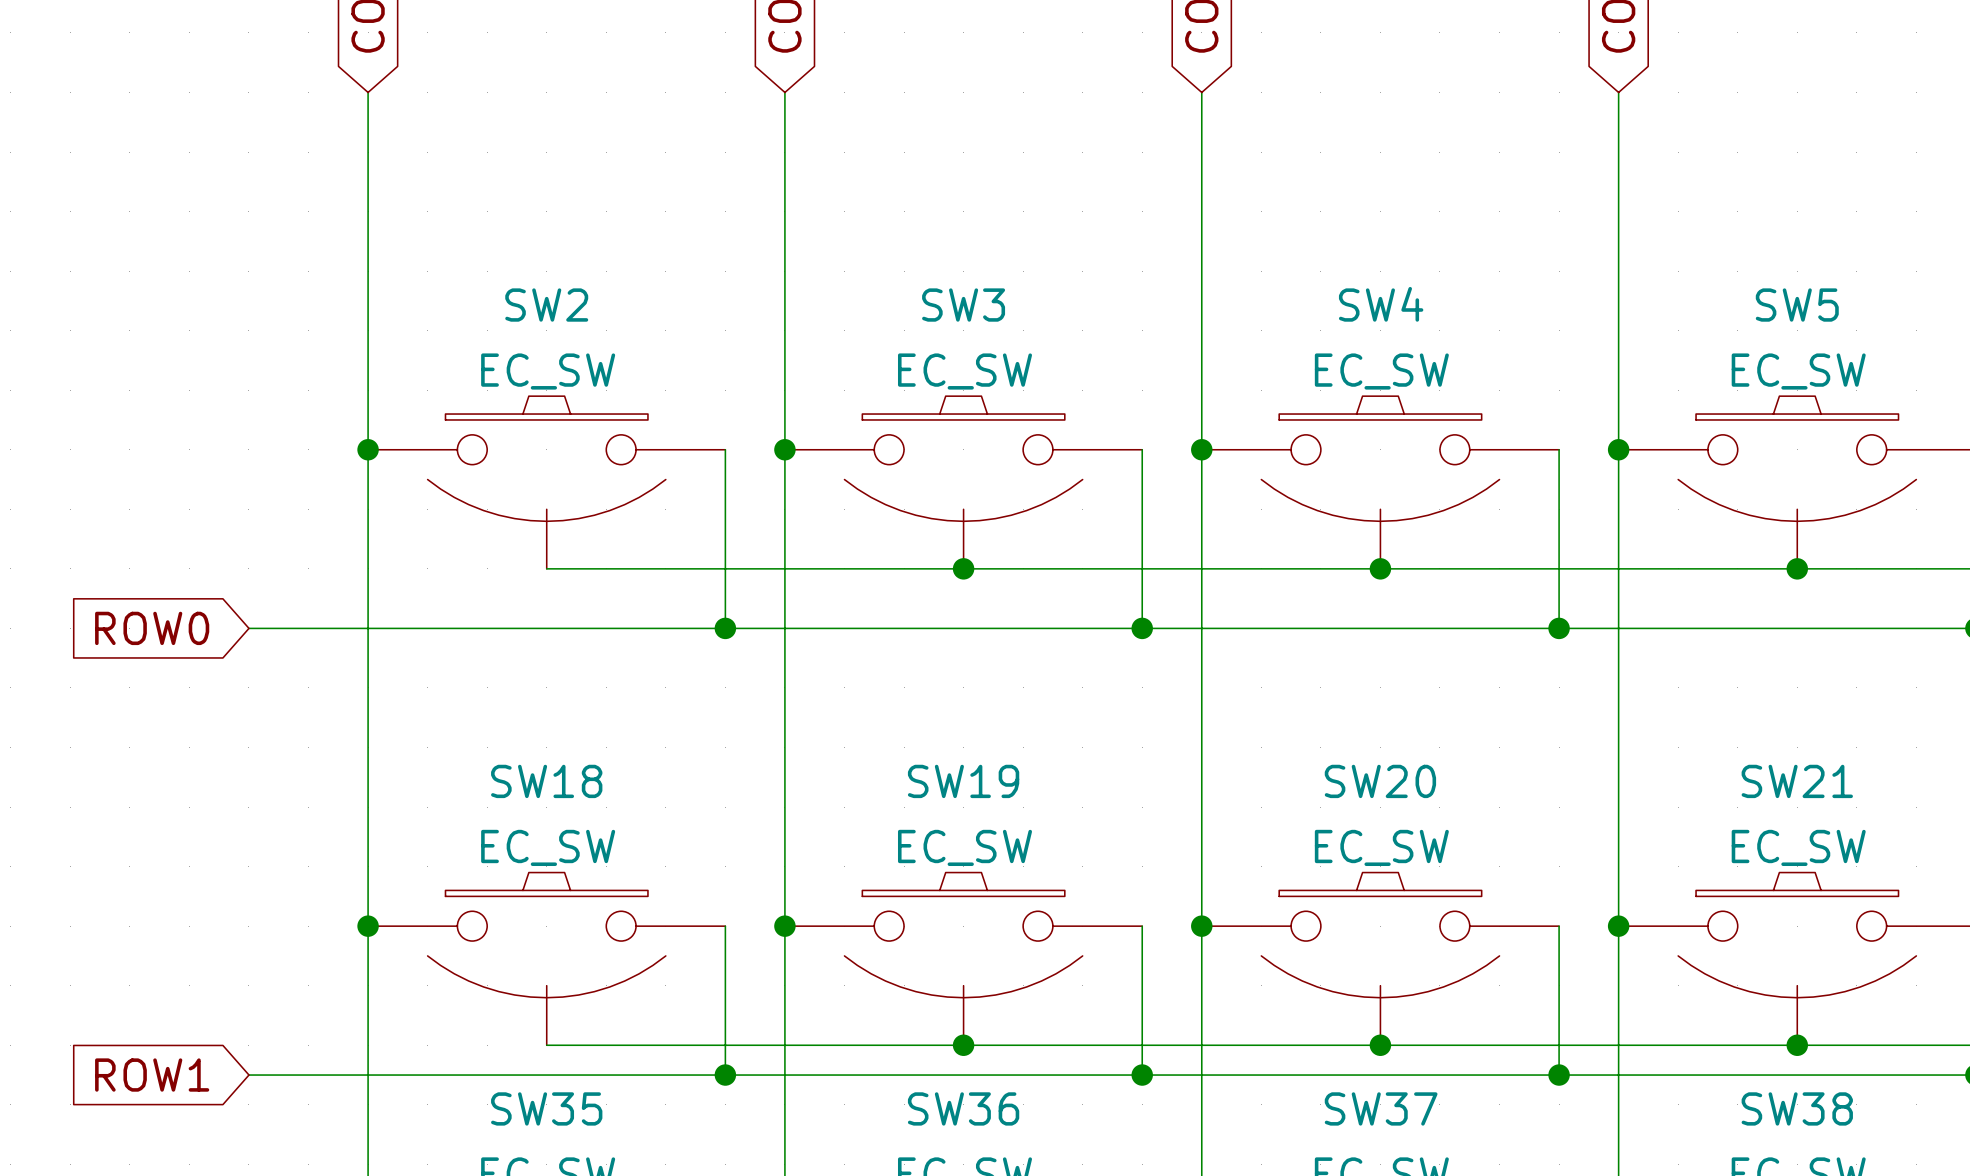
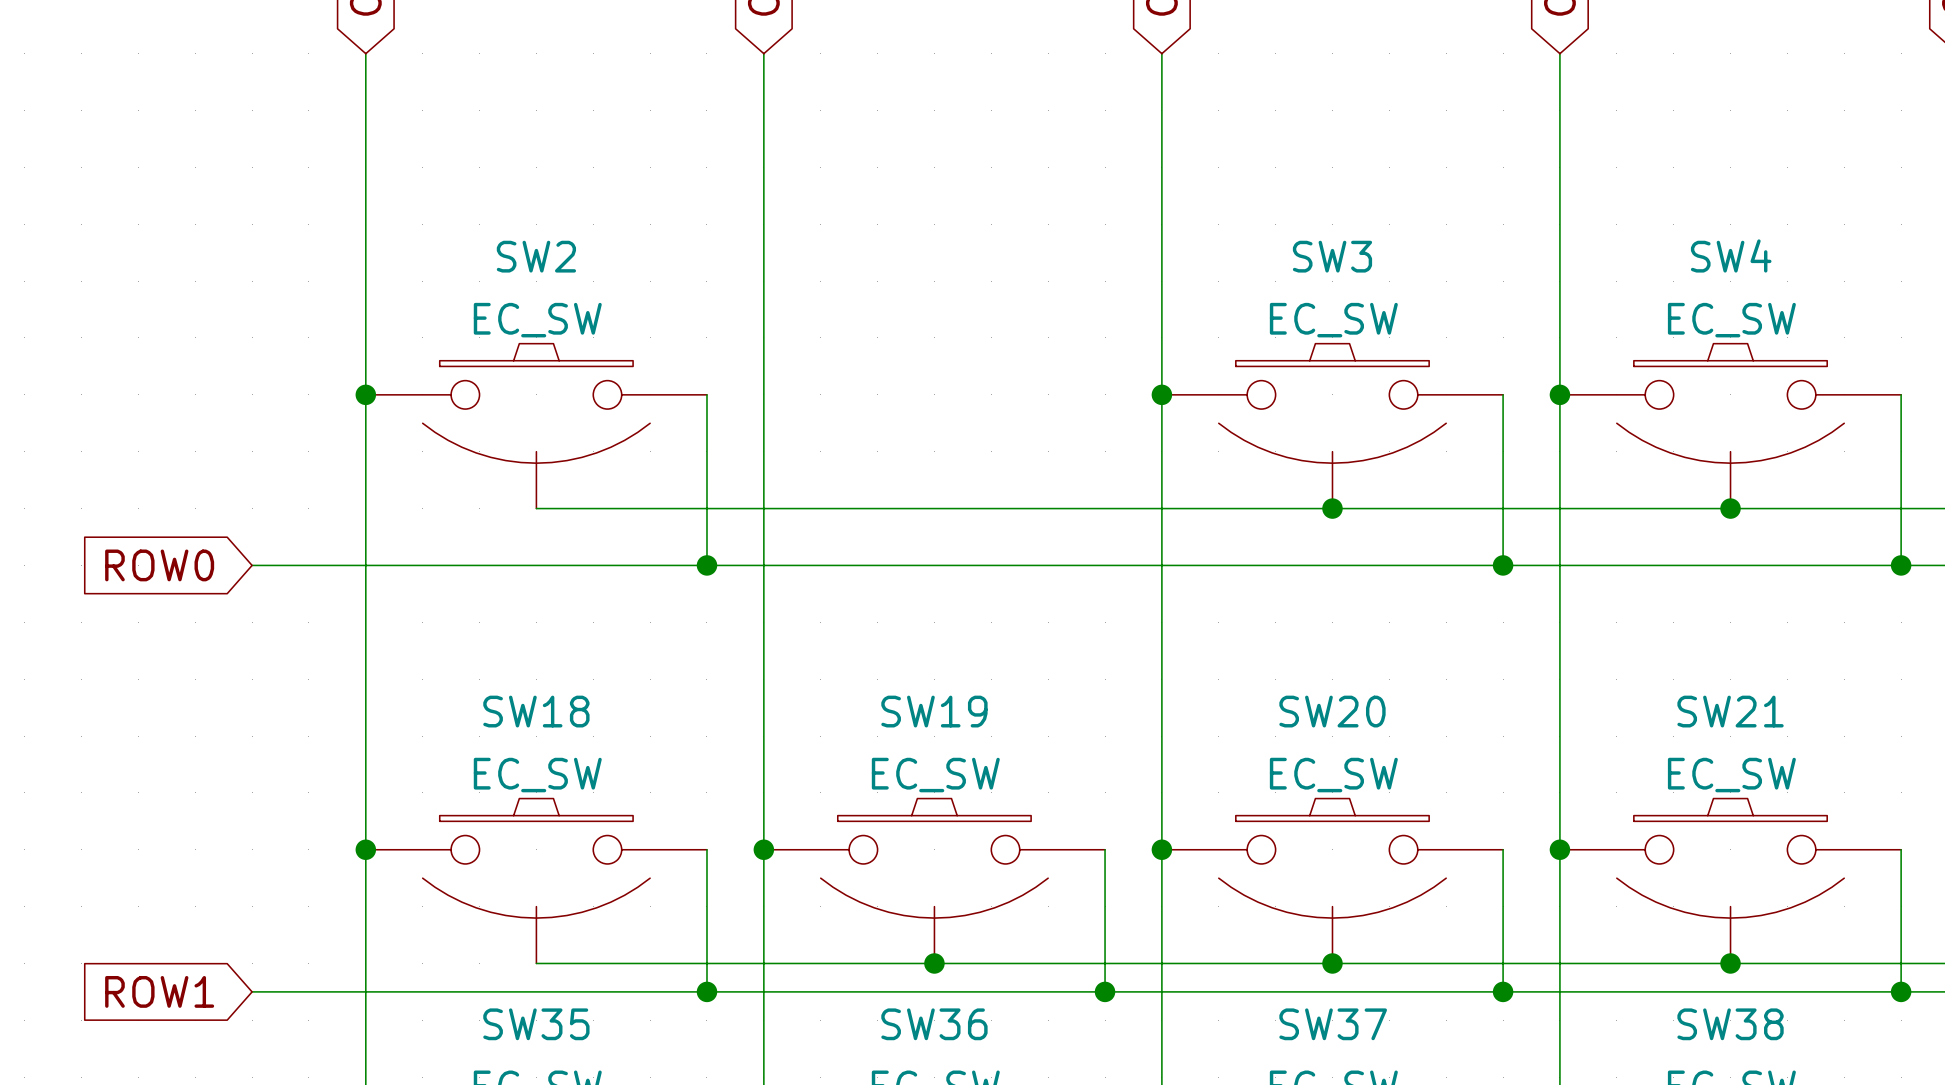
SW4 name: SW4 (1381, 304) -> SW3 (1332, 256)
SW5 name: SW5 (1797, 305) -> SW4 (1731, 255)
junction: (784, 449) -> none
wire: (1142, 449) (1142, 628) -> none
SW3: EC_SW (963, 482) -> none
junction: (963, 568) -> none
junction: (1142, 628) -> none

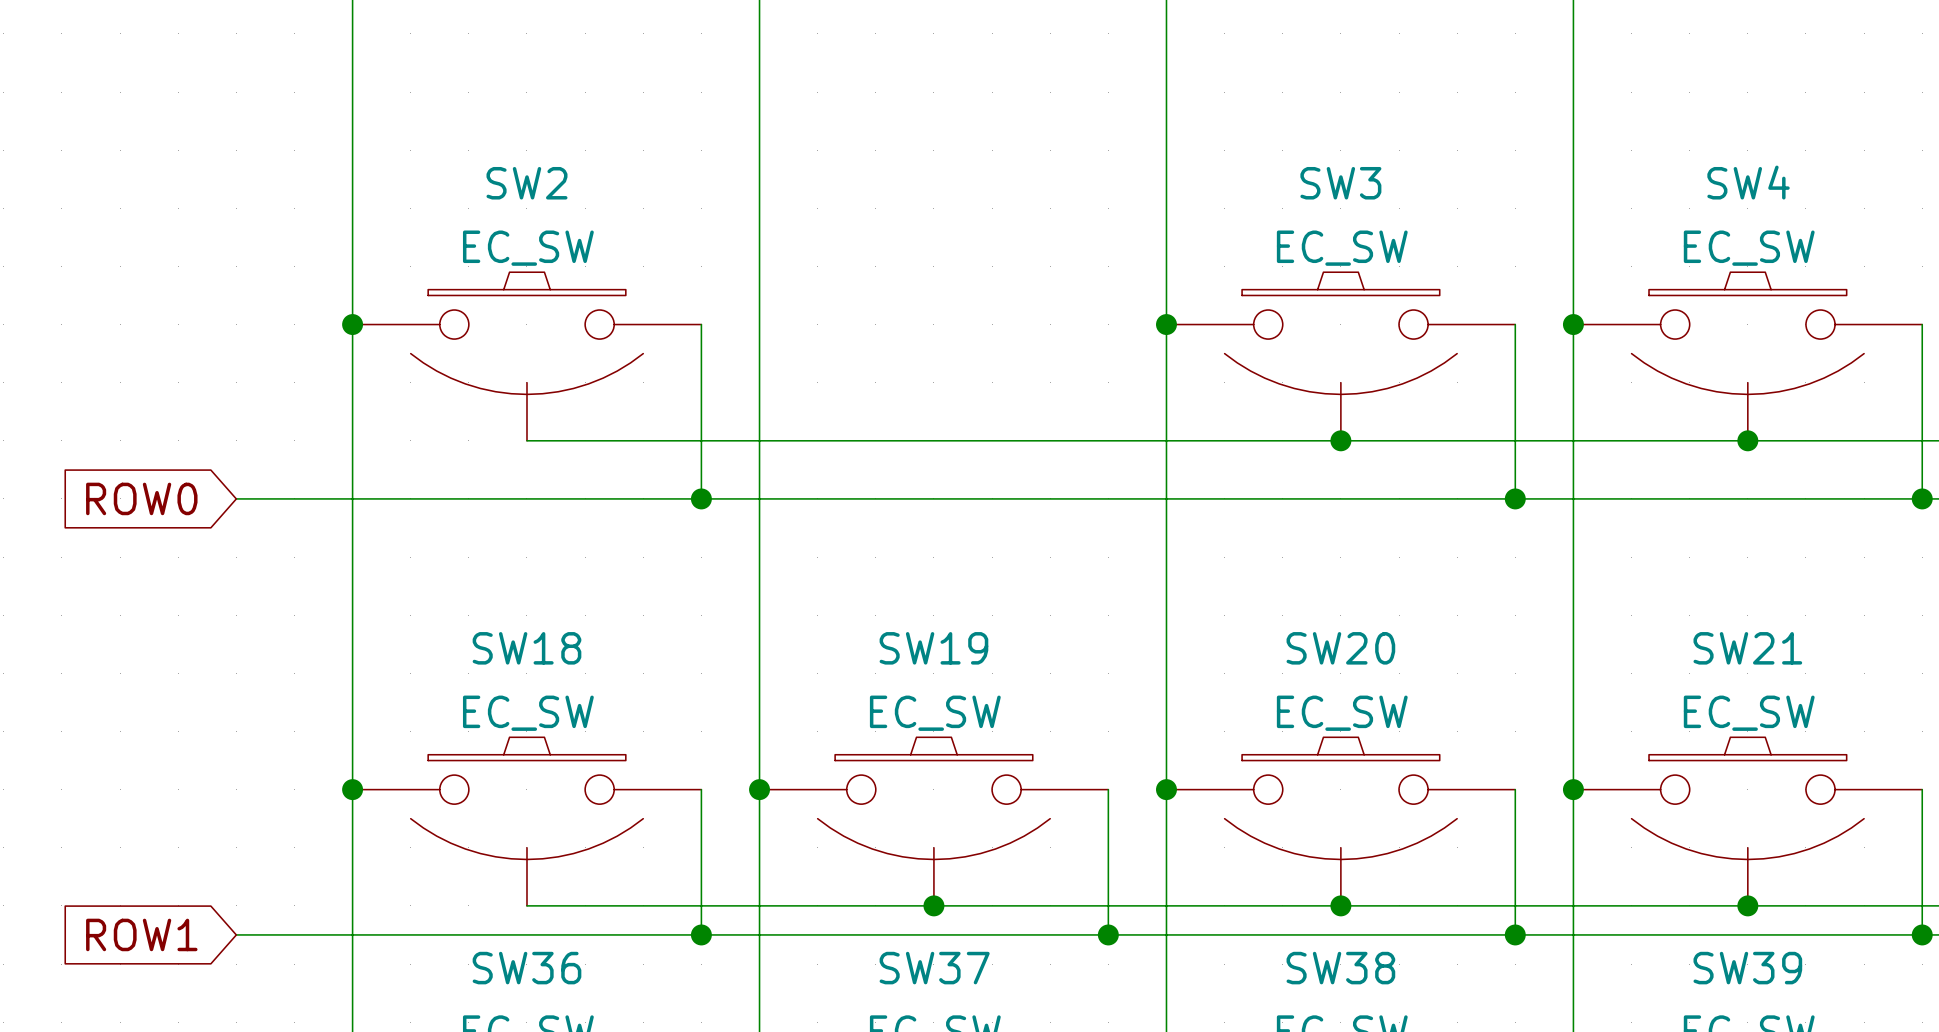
SW35 name: SW35 (536, 1024) -> SW36 (526, 968)
SW36 name: SW36 (934, 1024) -> SW37 (934, 968)
SW37 name: SW37 (1333, 1024) -> SW38 (1340, 968)
SW38 name: SW38 (1730, 1024) -> SW39 (1747, 968)

